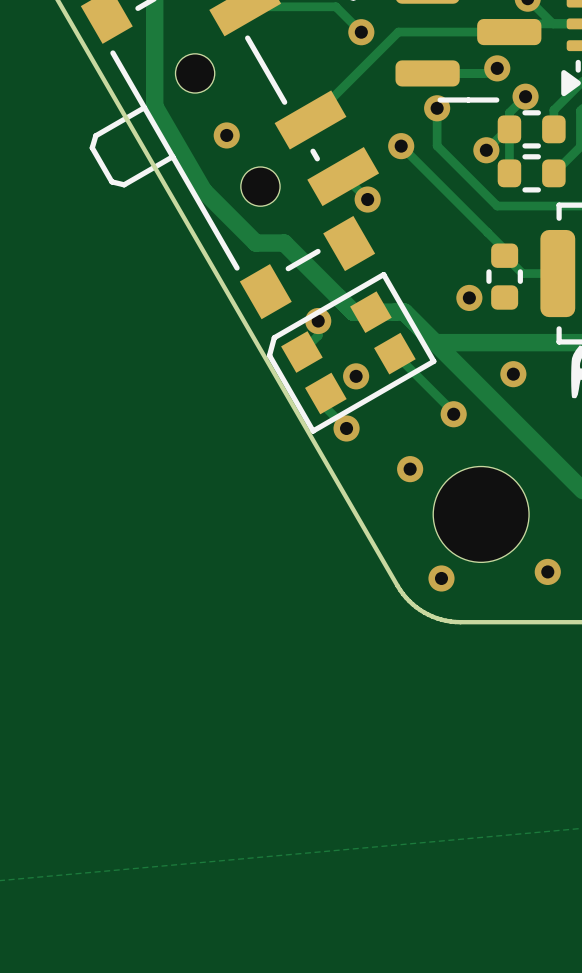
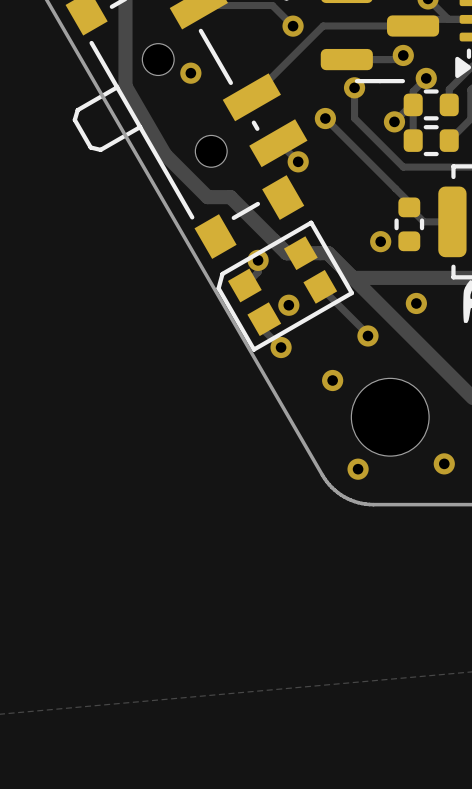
via position: (226, 135) -> (190, 73)

